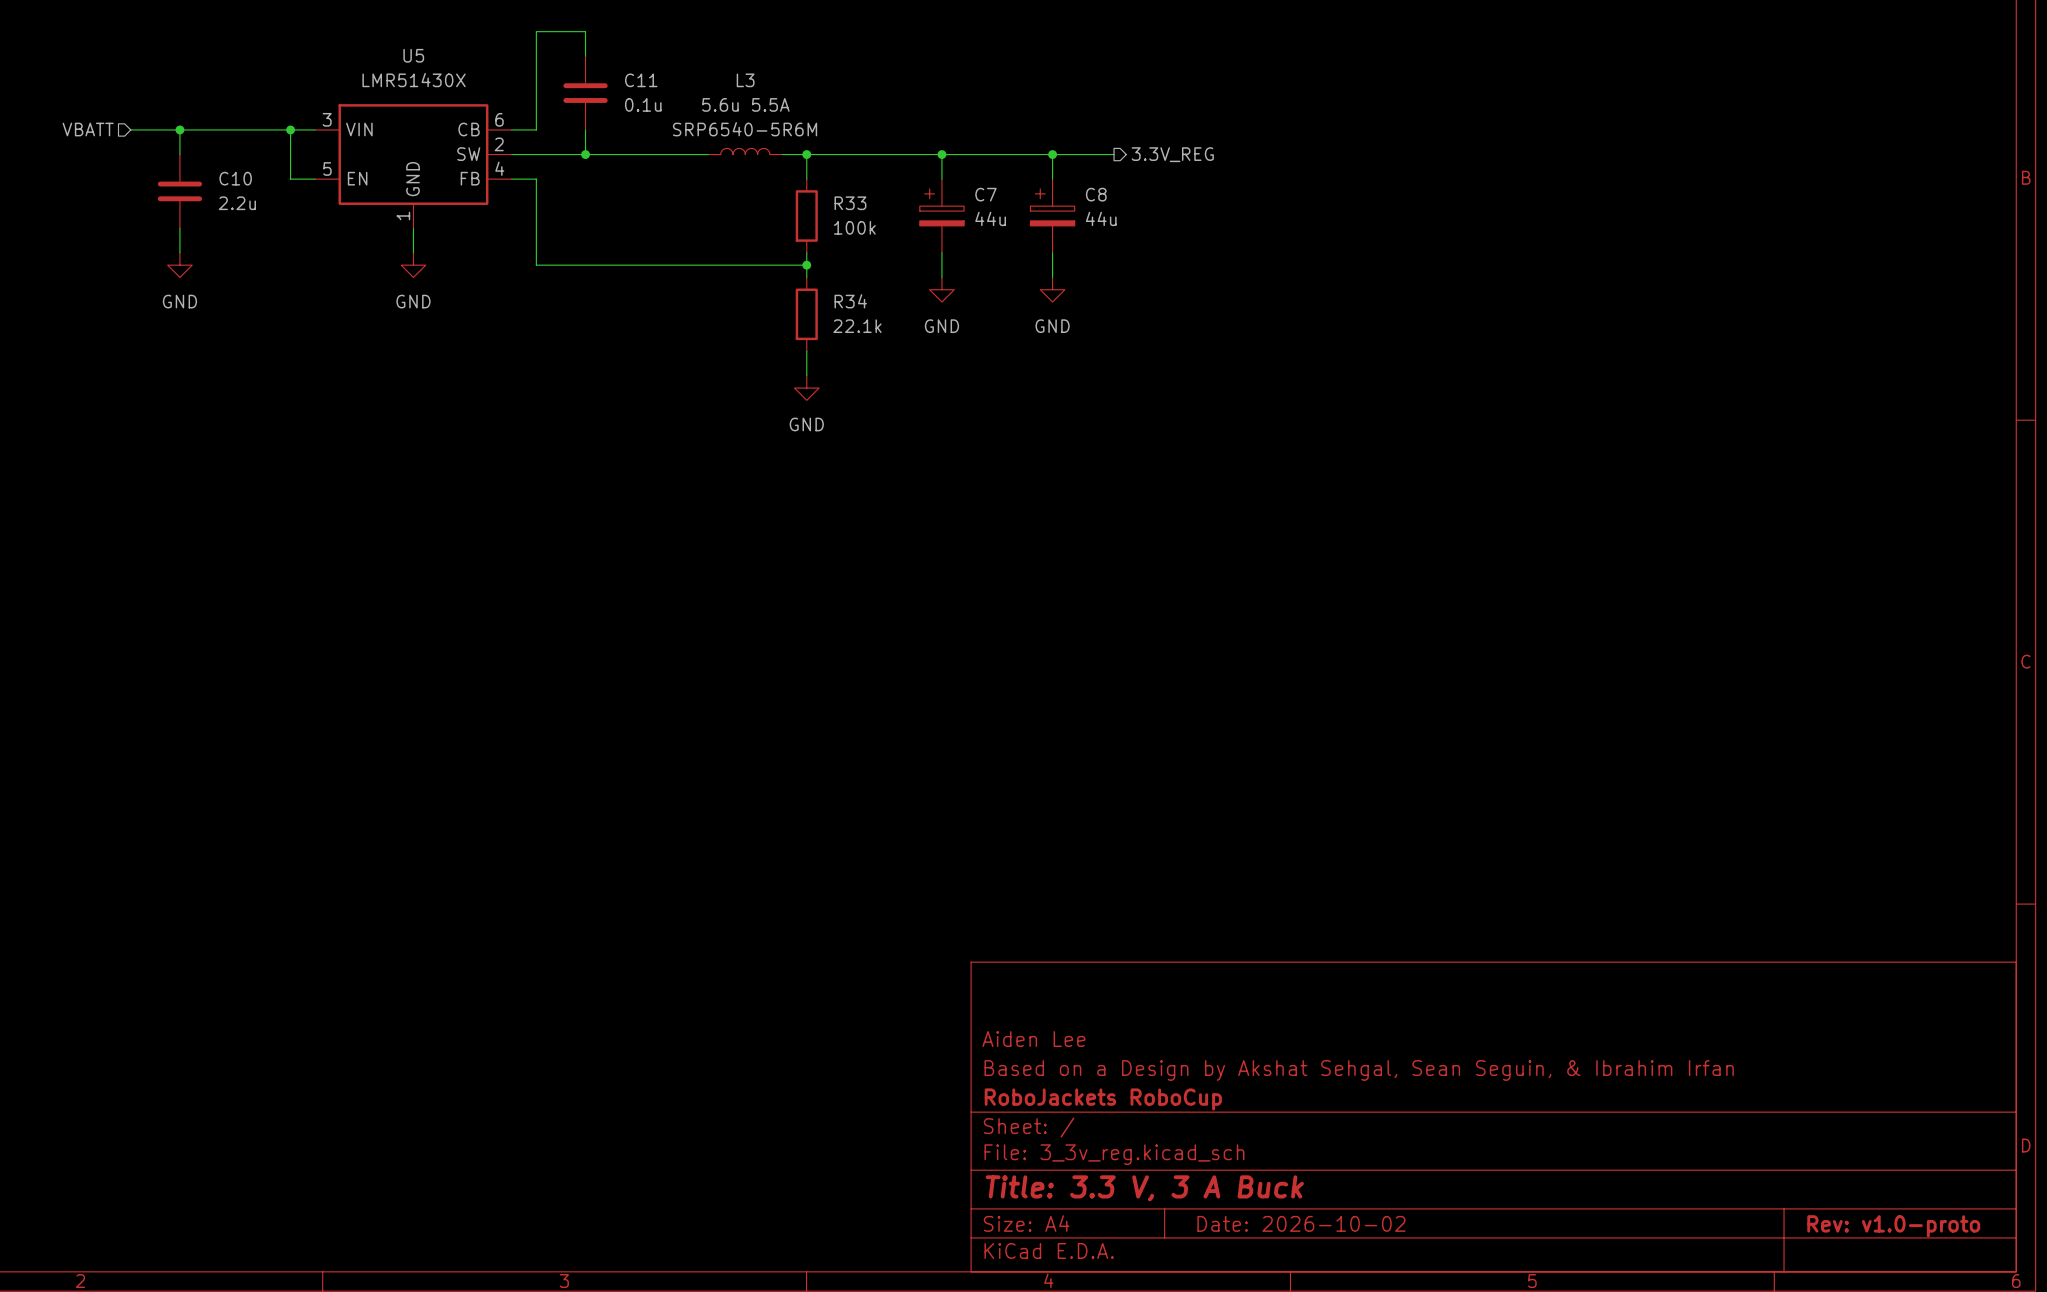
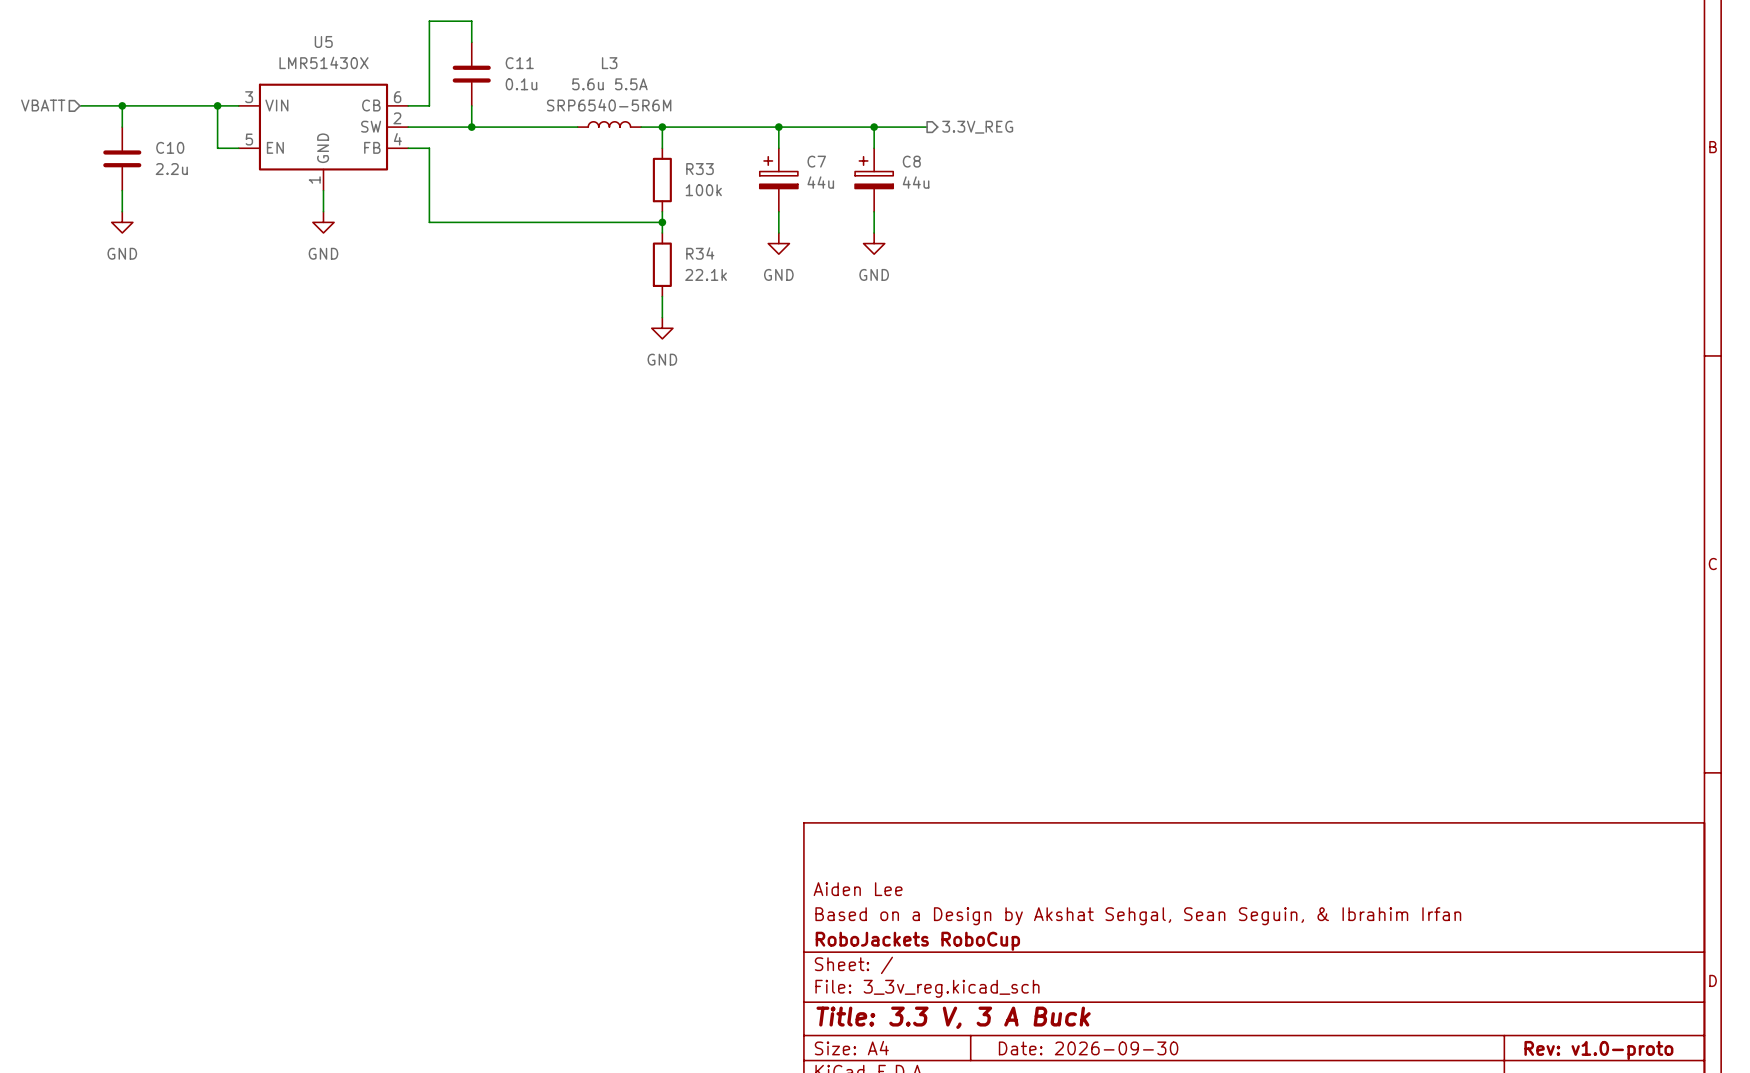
title block: Date: 2026-10-02 (1301, 1223) -> Date: 2026-09-30 (1088, 1048)

